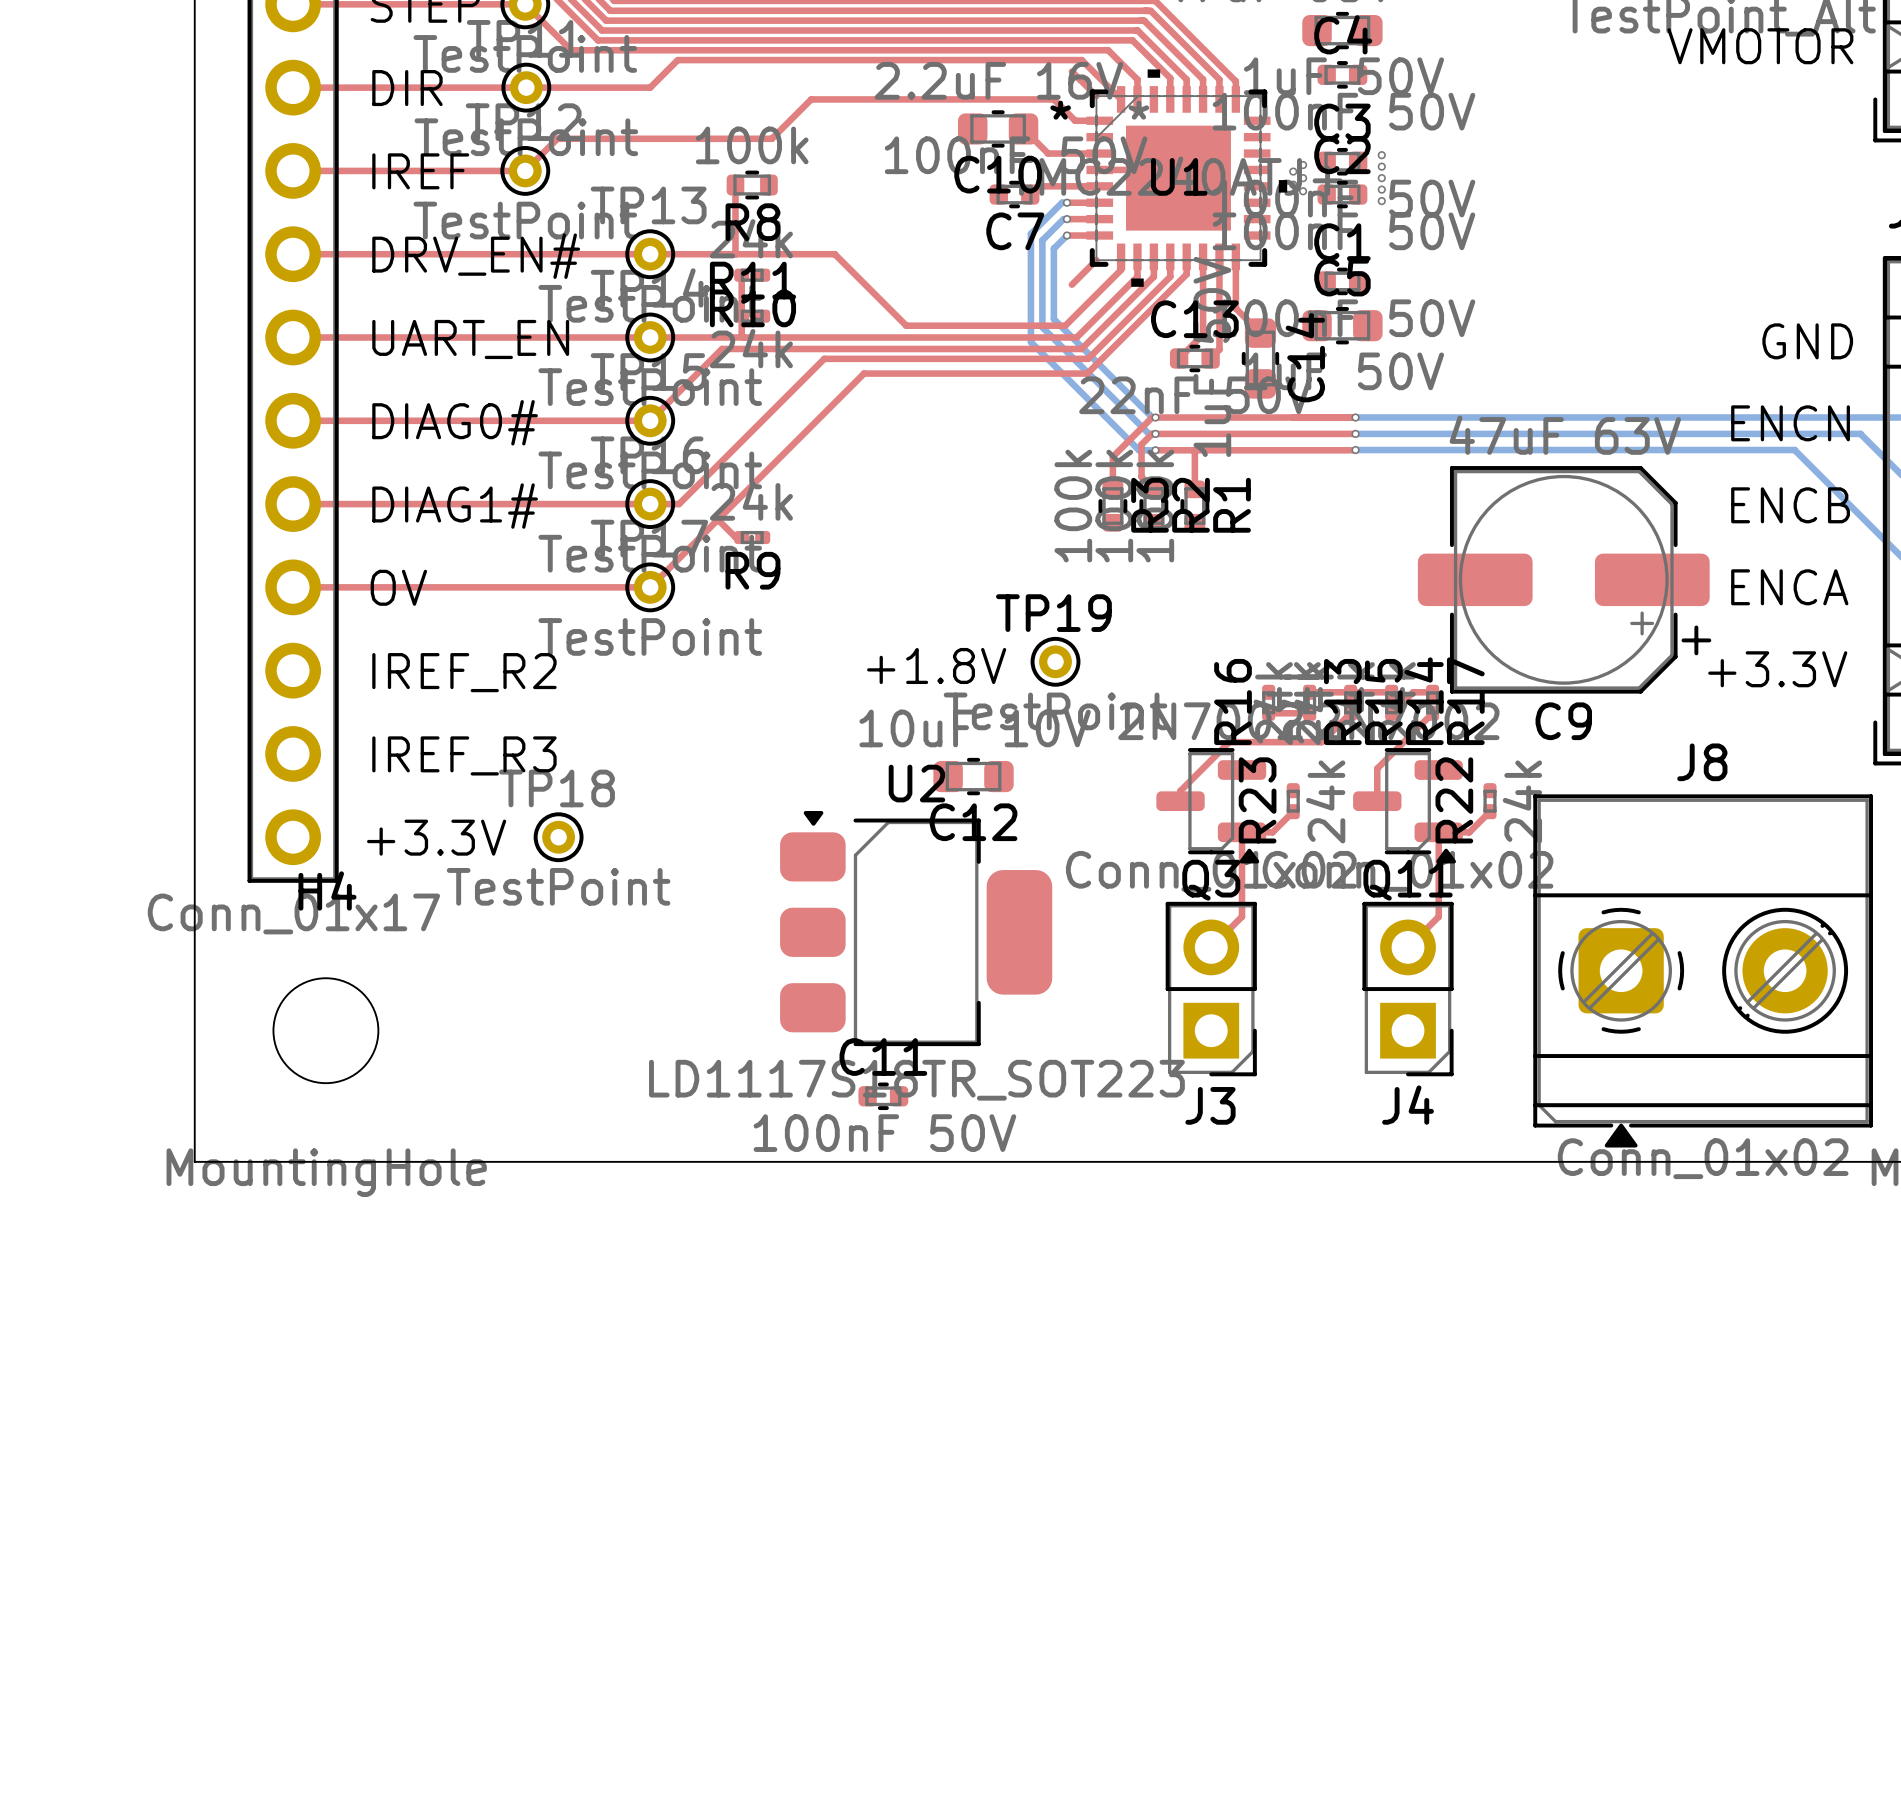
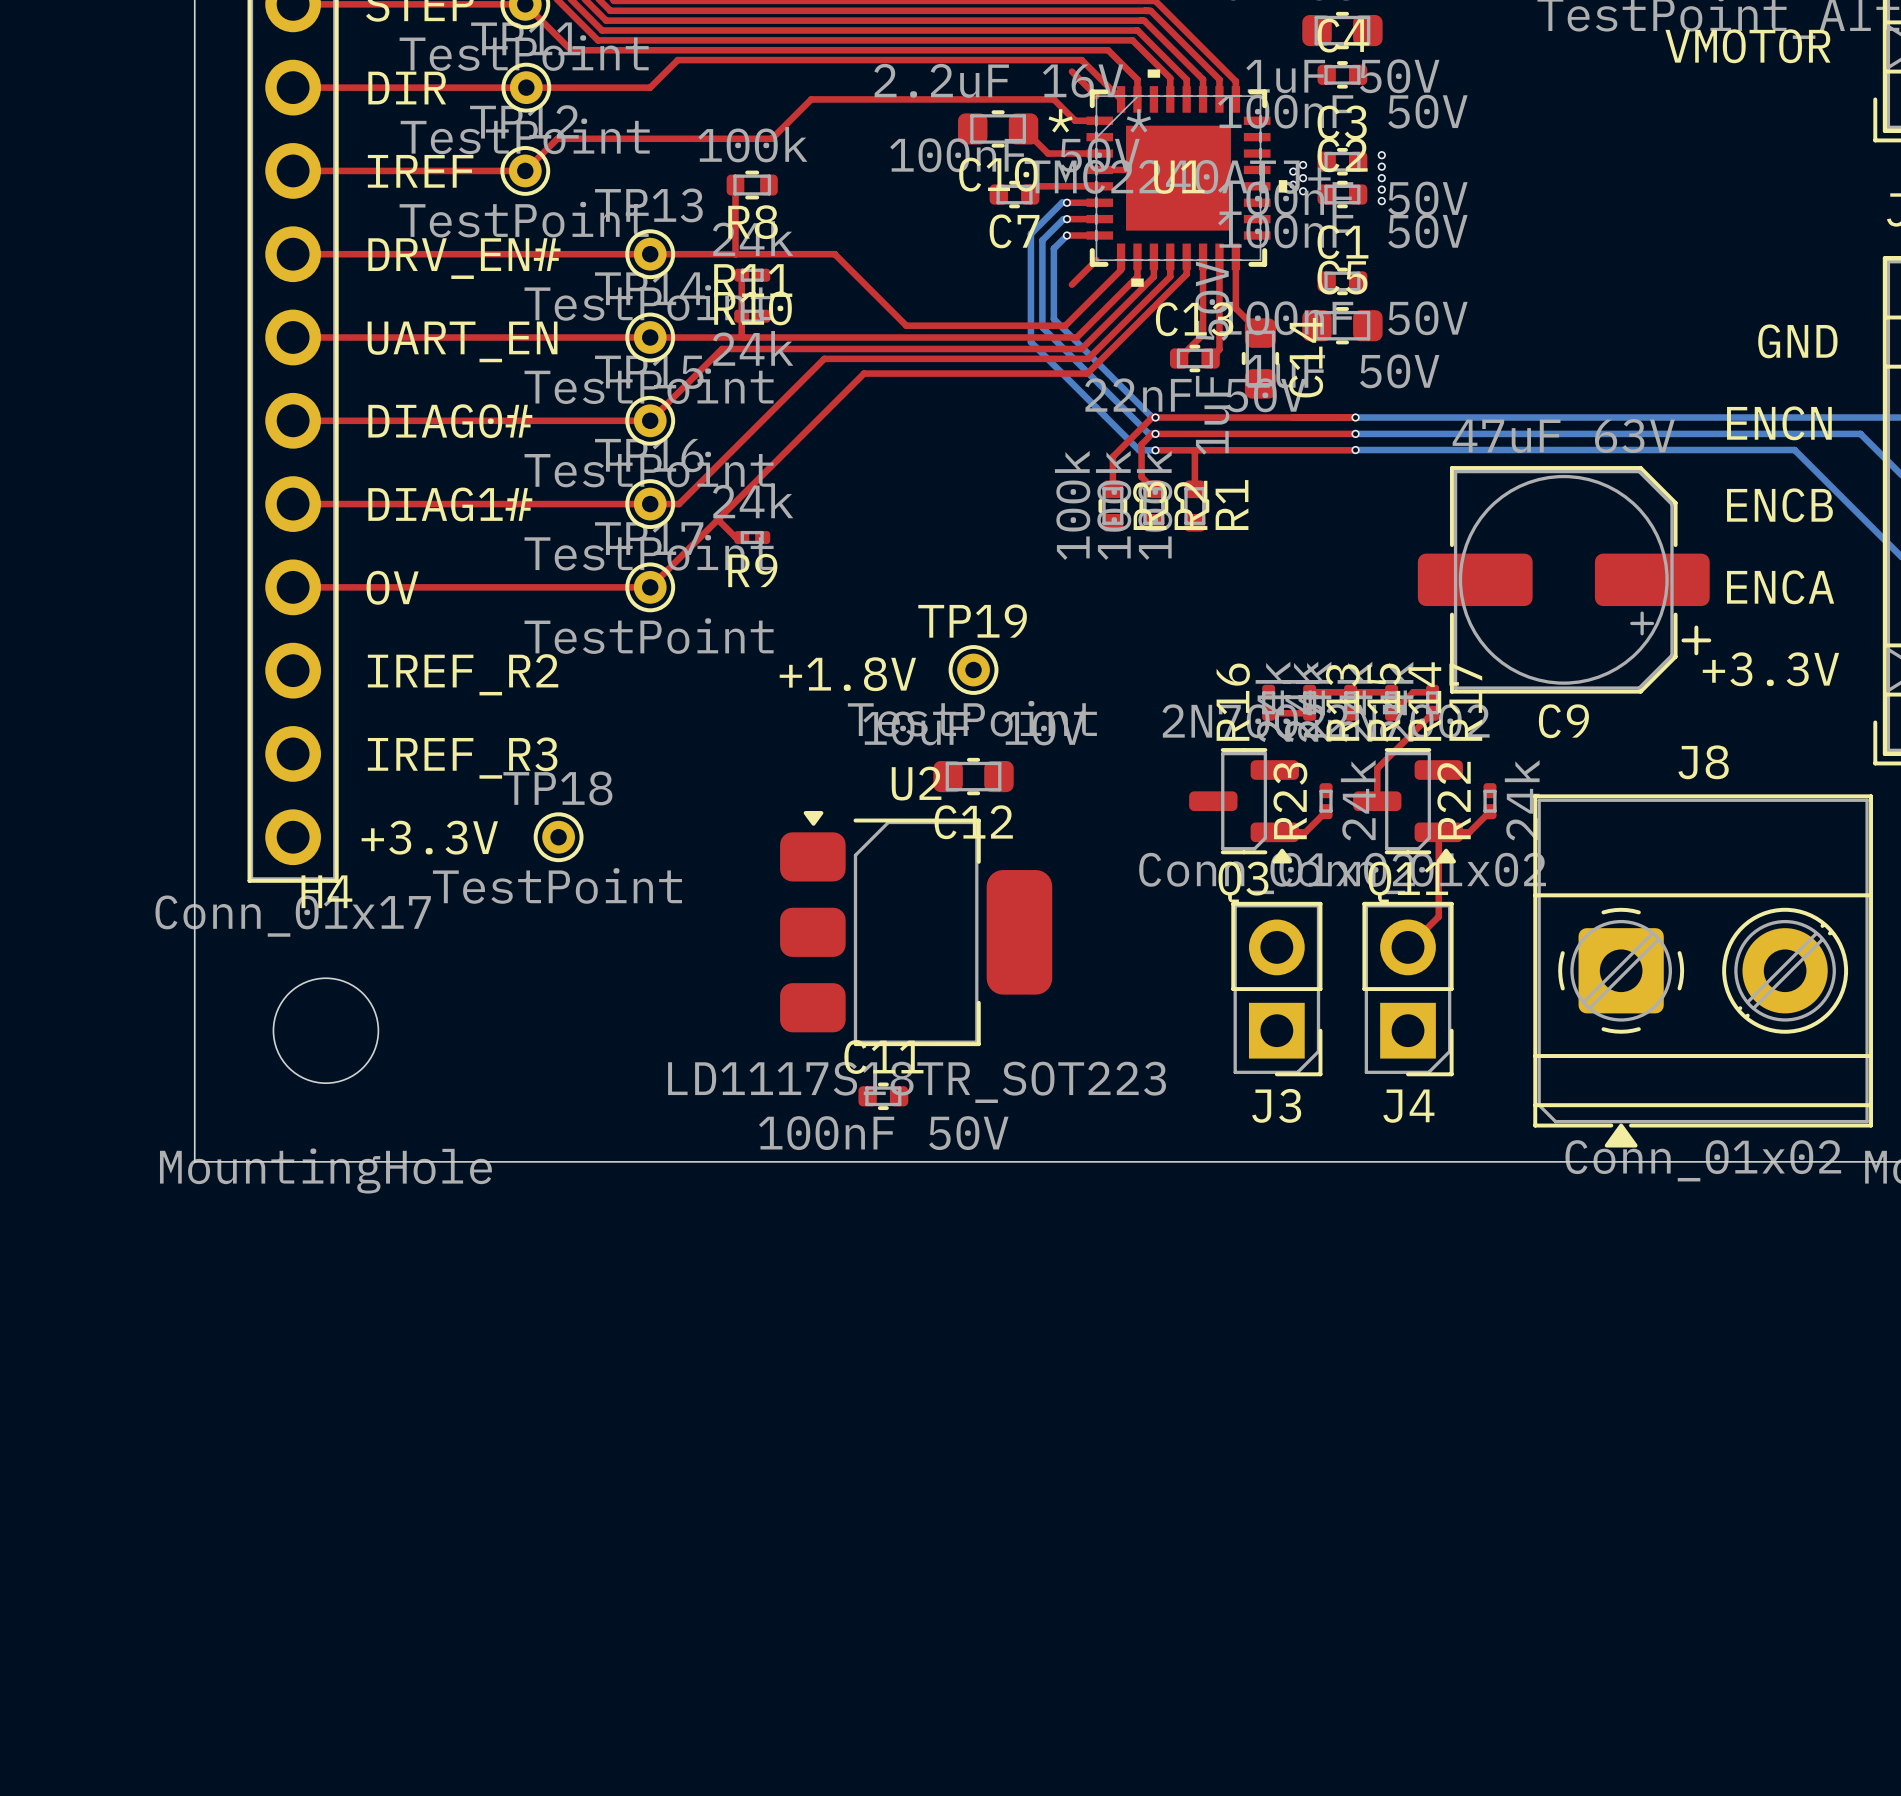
TP19 position: (1055, 661) -> (973, 670)
text position: +1.8V (936, 665) -> +1.8V (847, 674)
top track: (1350, 713) (1321, 742) (1229, 742) (1180, 790) (1180, 801) -> none
R23 position: (1293, 801) -> (1326, 801)
Q3 position: (1211, 805) -> (1244, 805)
top track: (1293, 811) (1272, 832) (1242, 832) (1242, 916) (1211, 947) -> none
top track: none -> (1326, 811) (1305, 832) (1274, 832)
J3 position: (1211, 989) -> (1276, 989)

